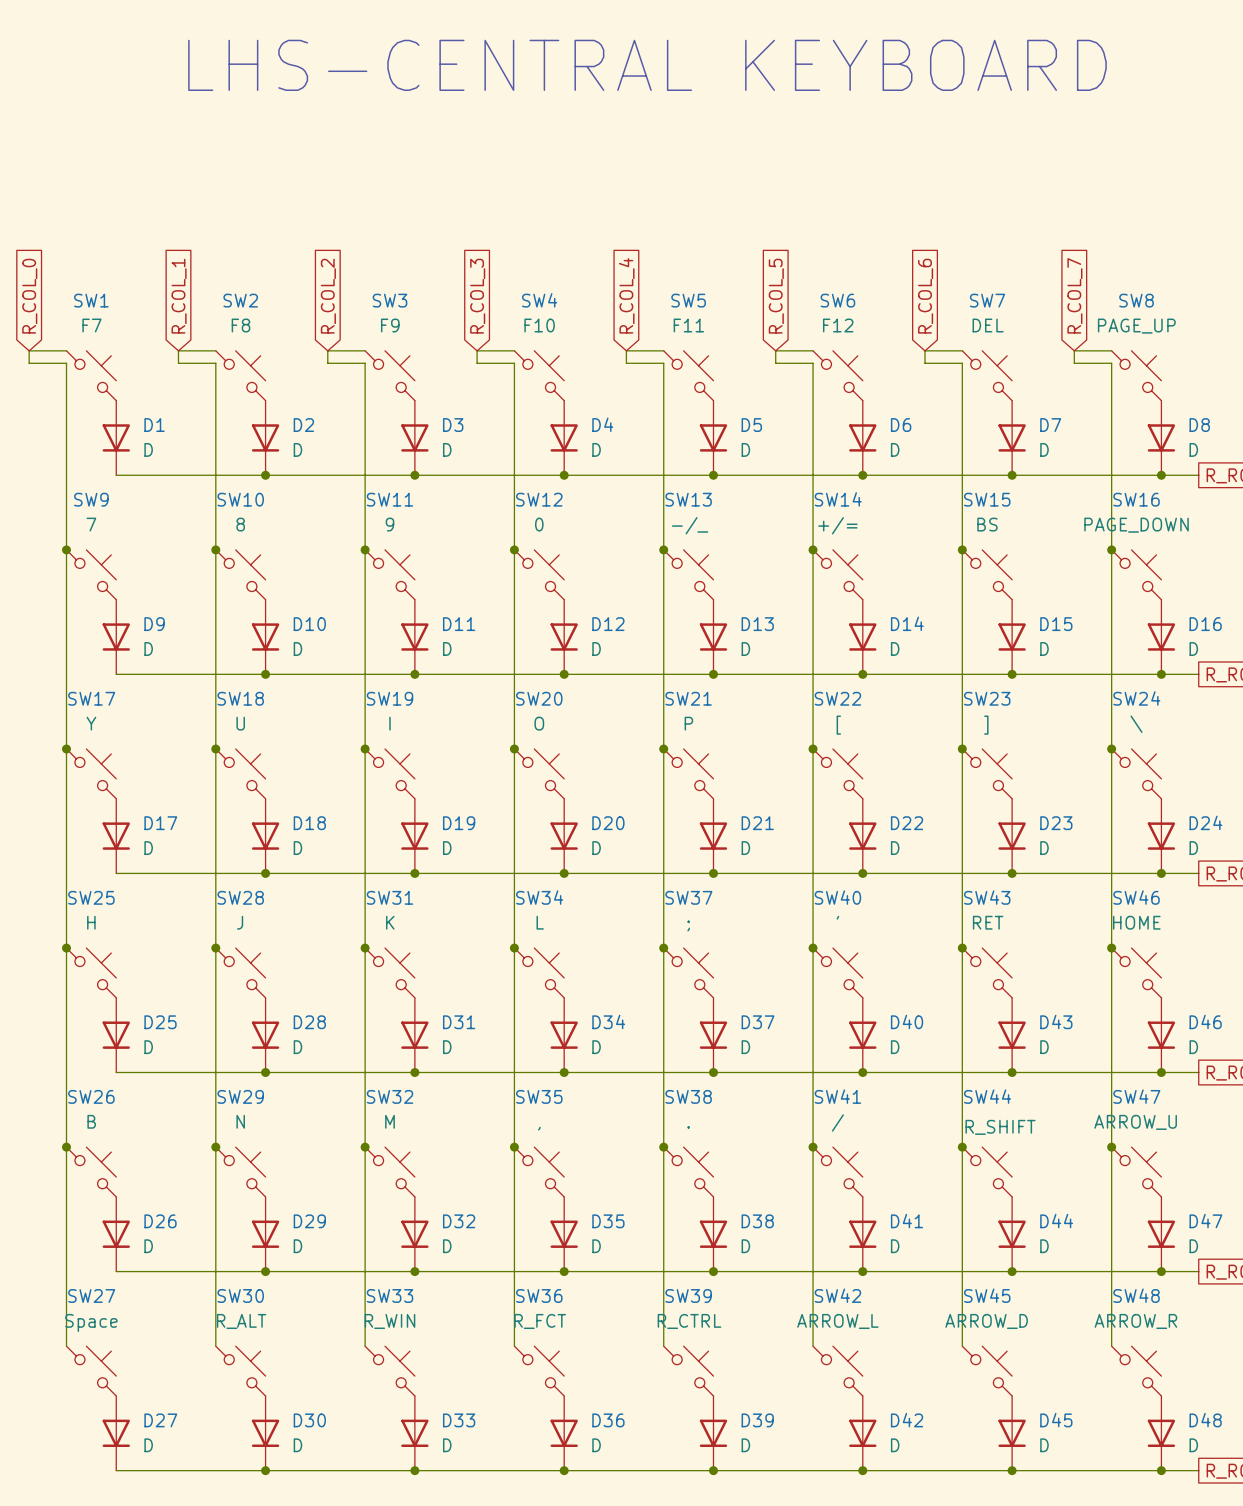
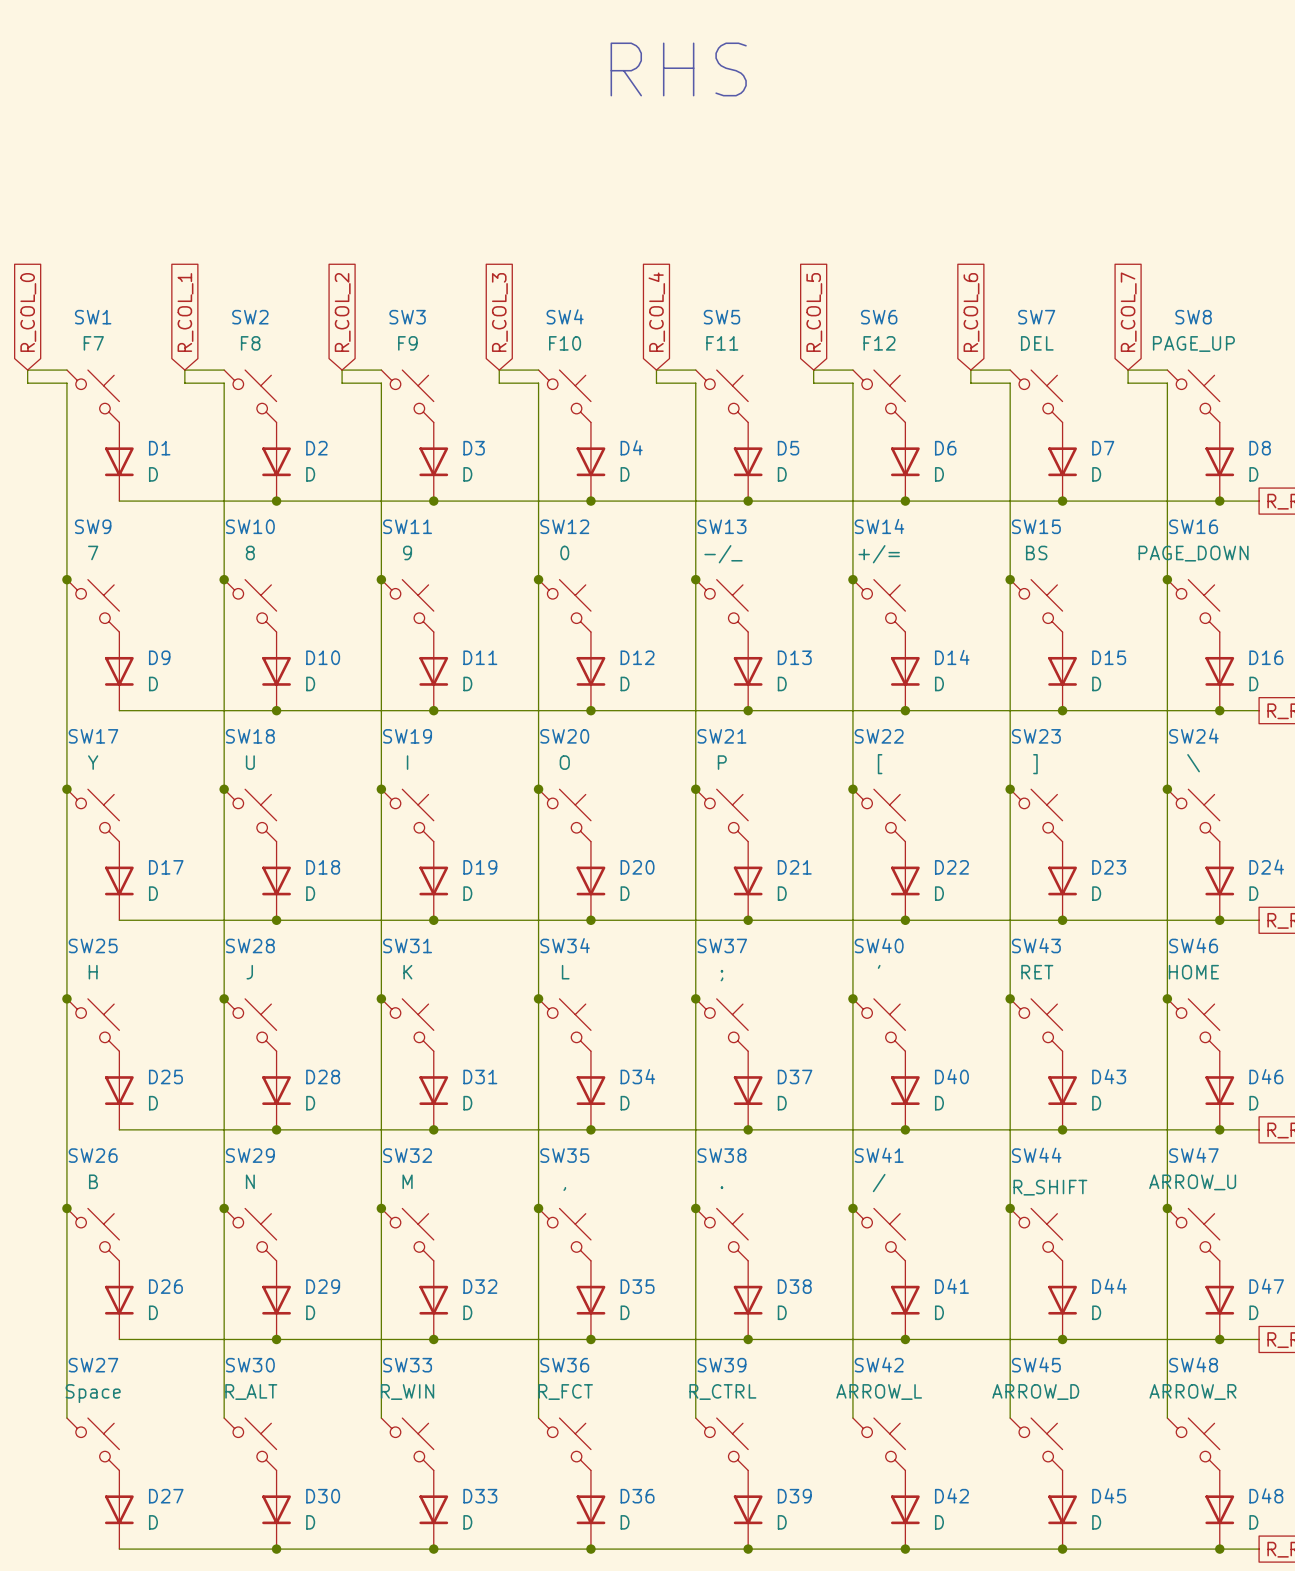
text: LHS-CENTRAL KEYBOARD (647, 65) -> RHS (678, 69)

